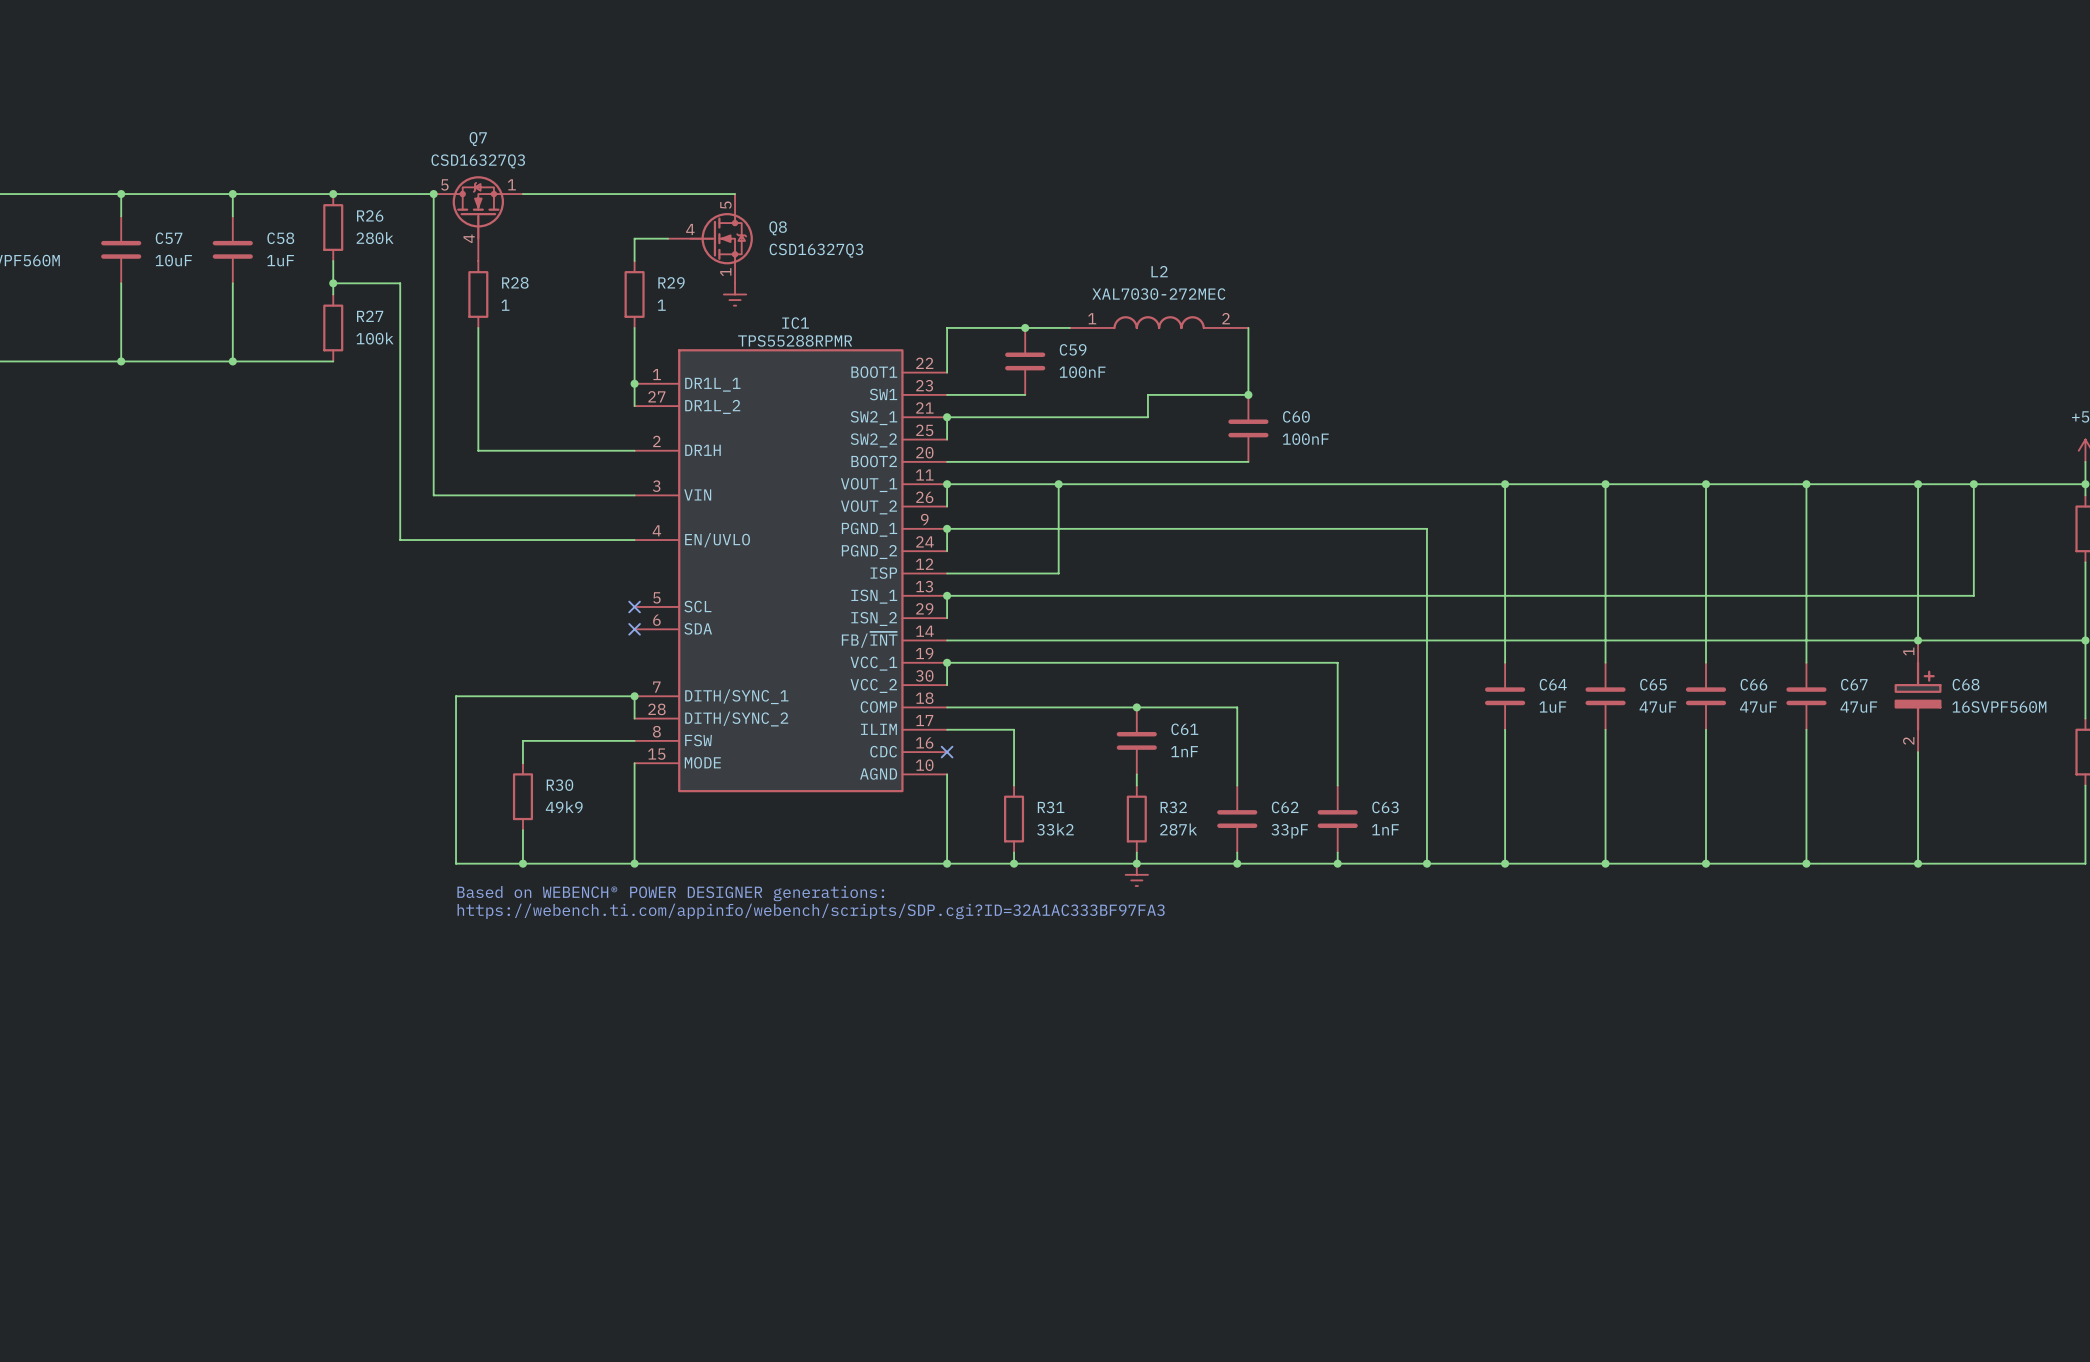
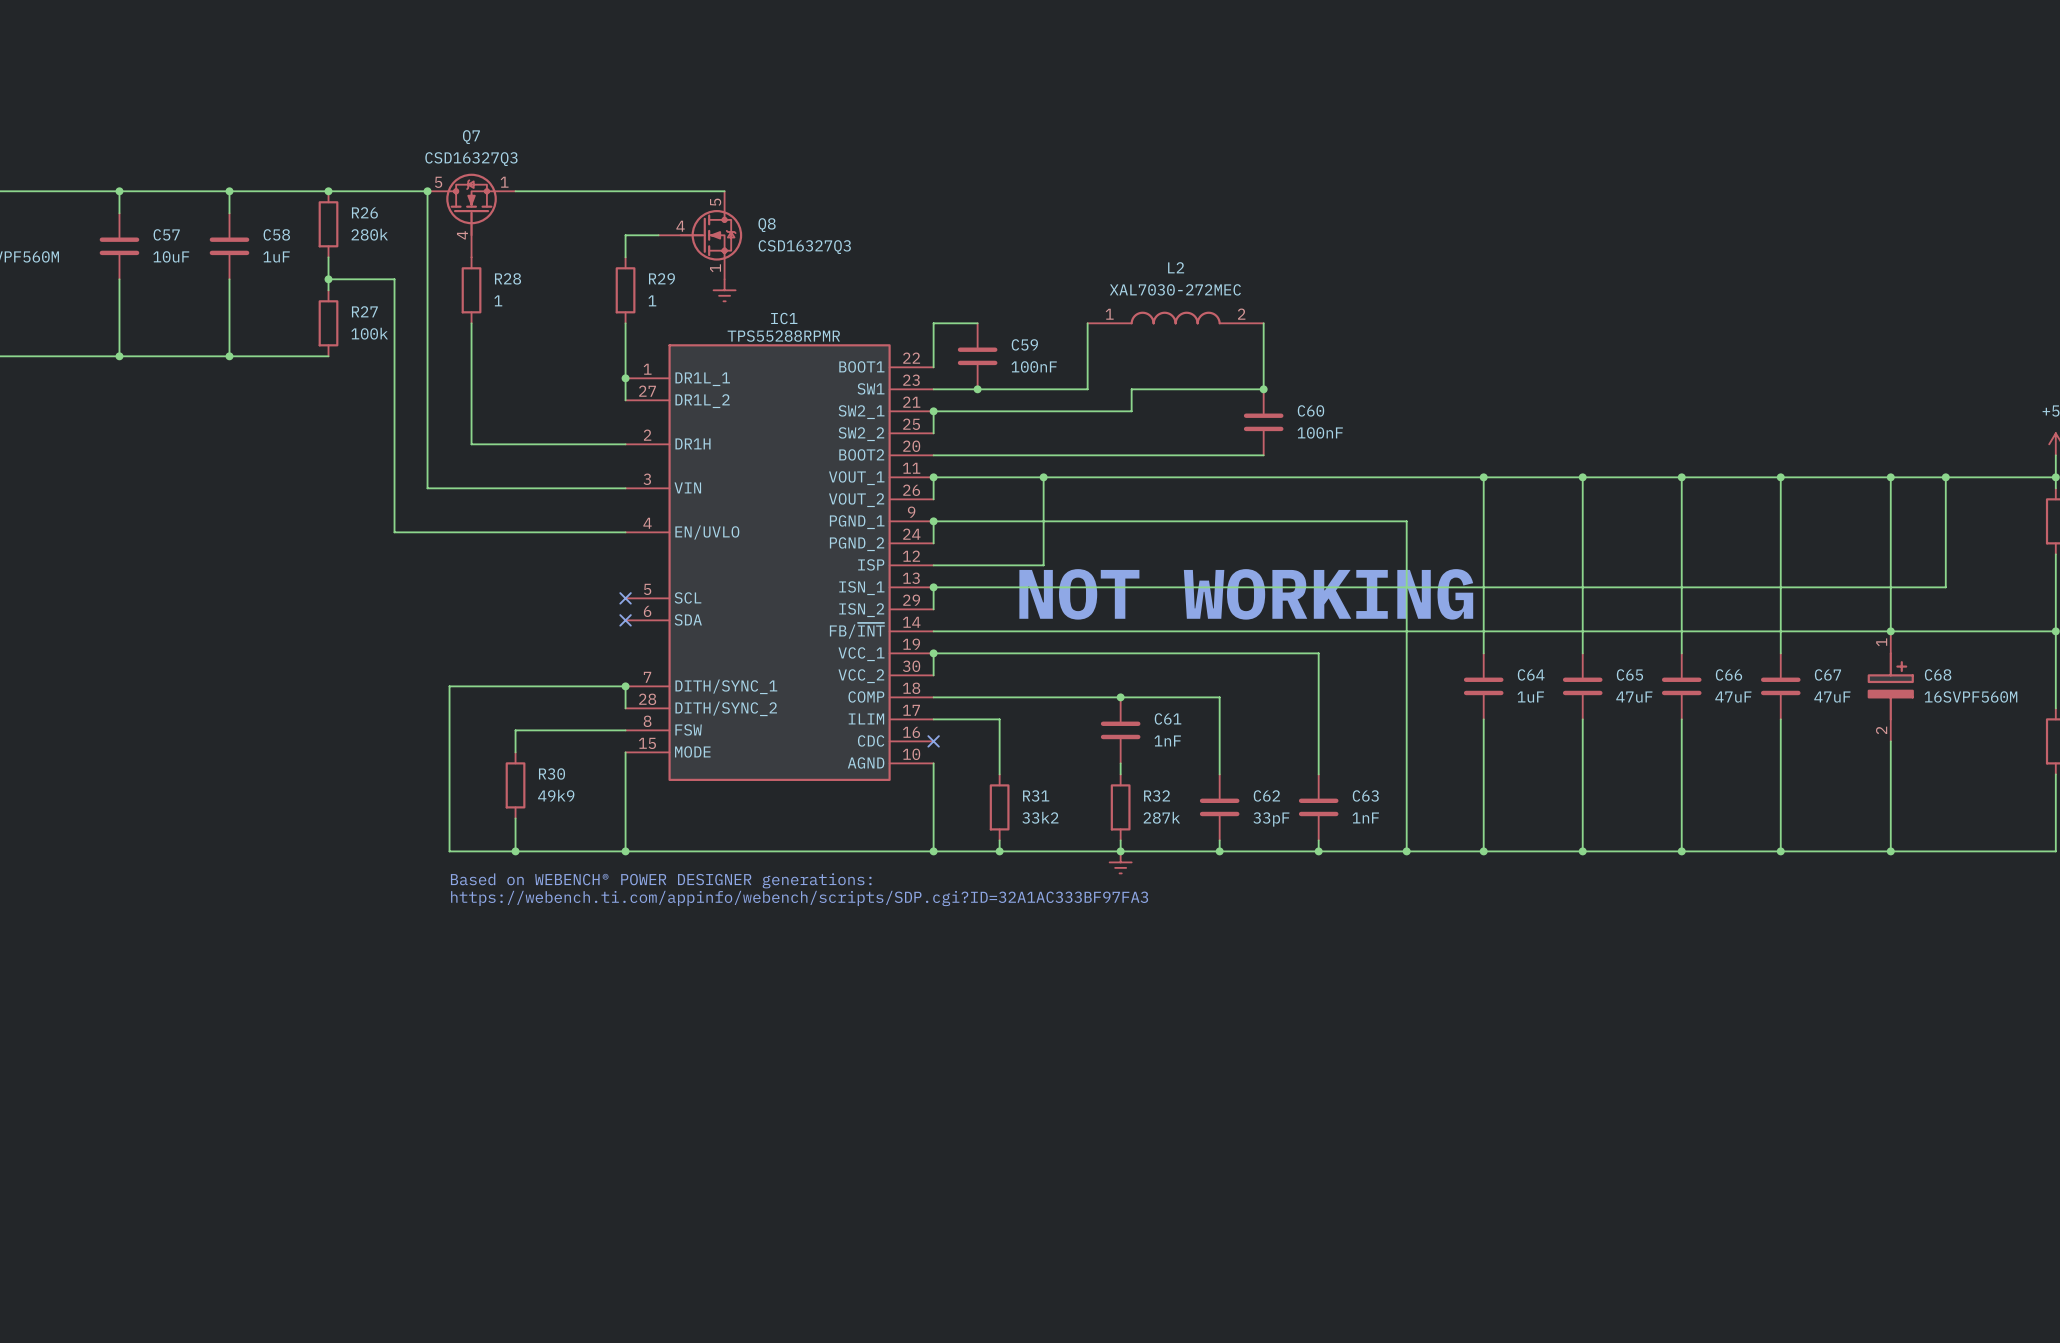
L2 position: (1159, 322) -> (1175, 318)
wire: (991, 327) (1069, 327) -> none
junction: (1025, 327) -> none
wire: none -> (1087, 323) (1087, 389) (1010, 389)
wire: (1248, 327) (1248, 394) -> (1263, 323) (1263, 389) (1230, 389)
C59 position: (1025, 361) -> (977, 356)
junction: none -> (977, 389)
junction position: (1248, 394) -> (1263, 389)
C60 position: (1248, 428) -> (1263, 422)
wire: none -> (1230, 455) (1263, 455)
text: none -> NOT WORKING (1246, 594)

